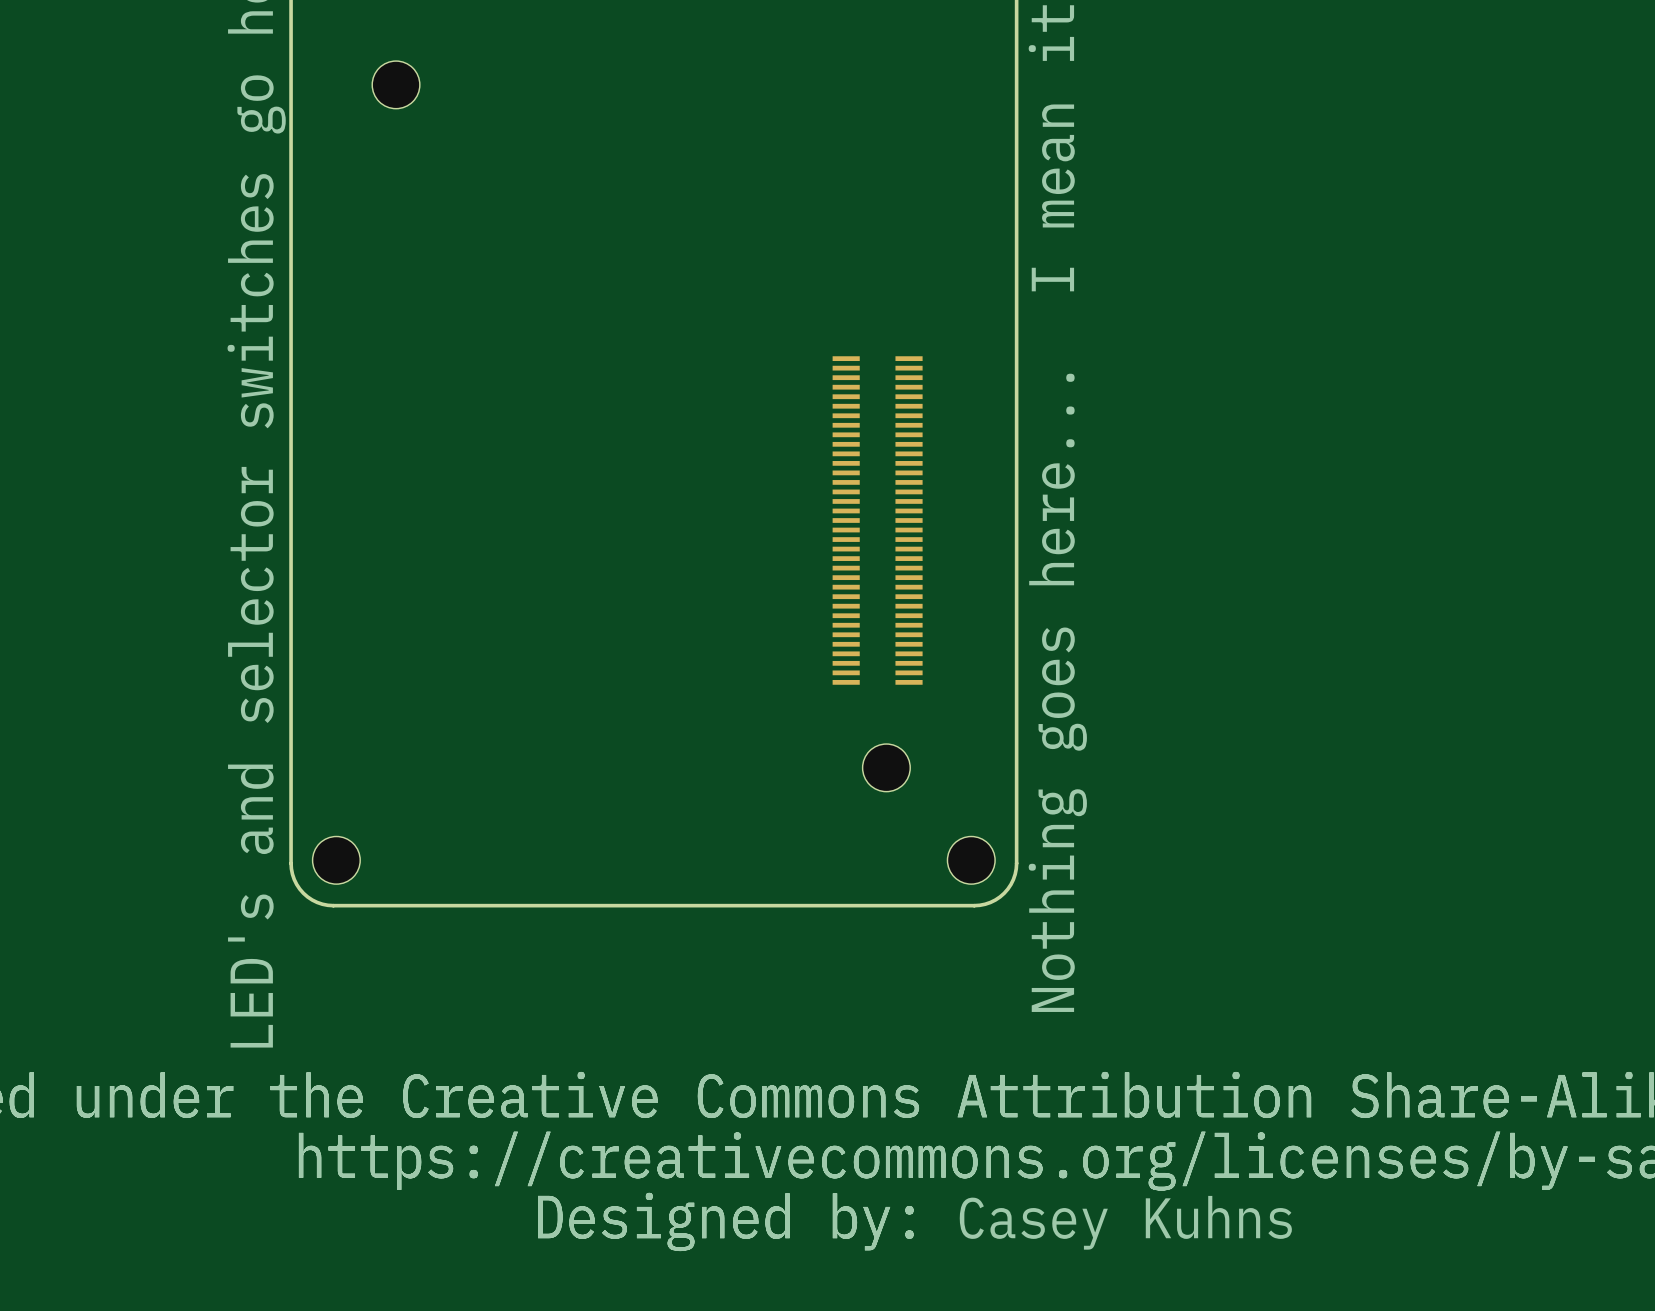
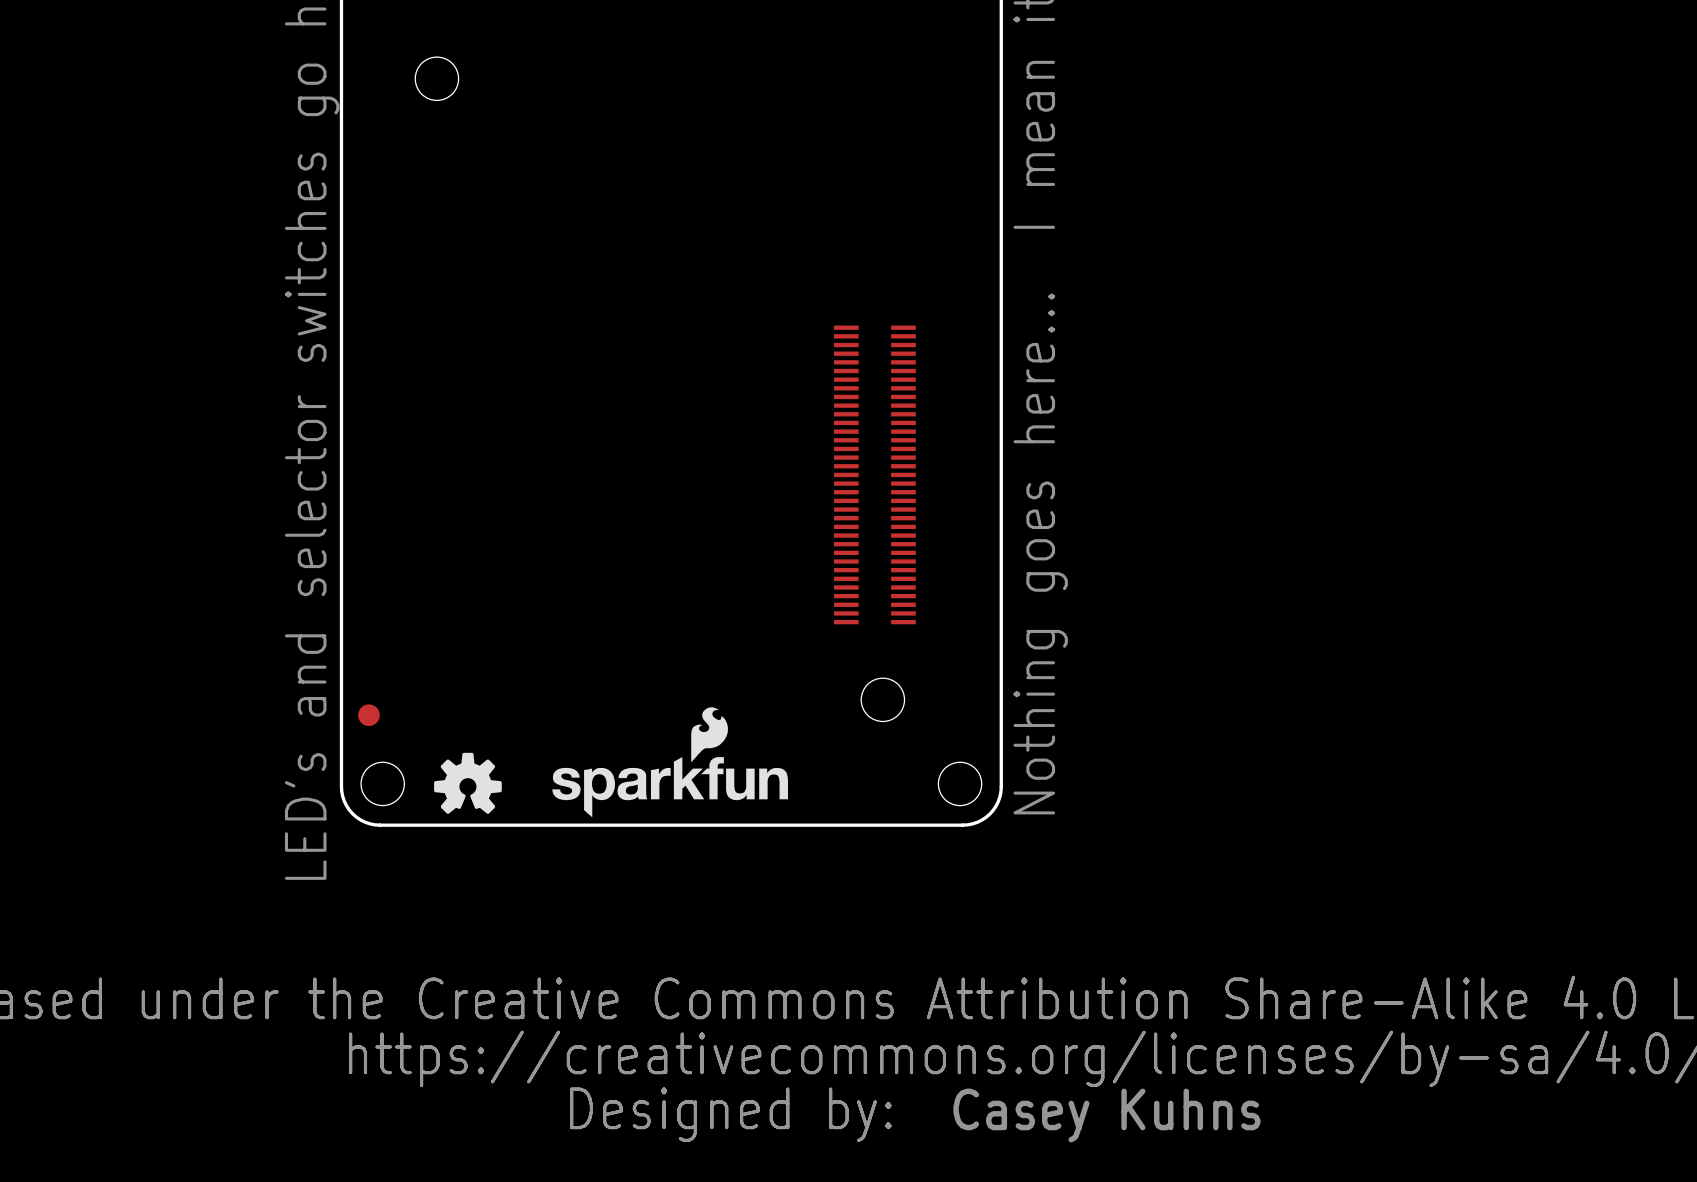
drawing: none -> [552, 707, 788, 818]
part: none -> (368, 715)
drawing: none -> [434, 752, 502, 814]

